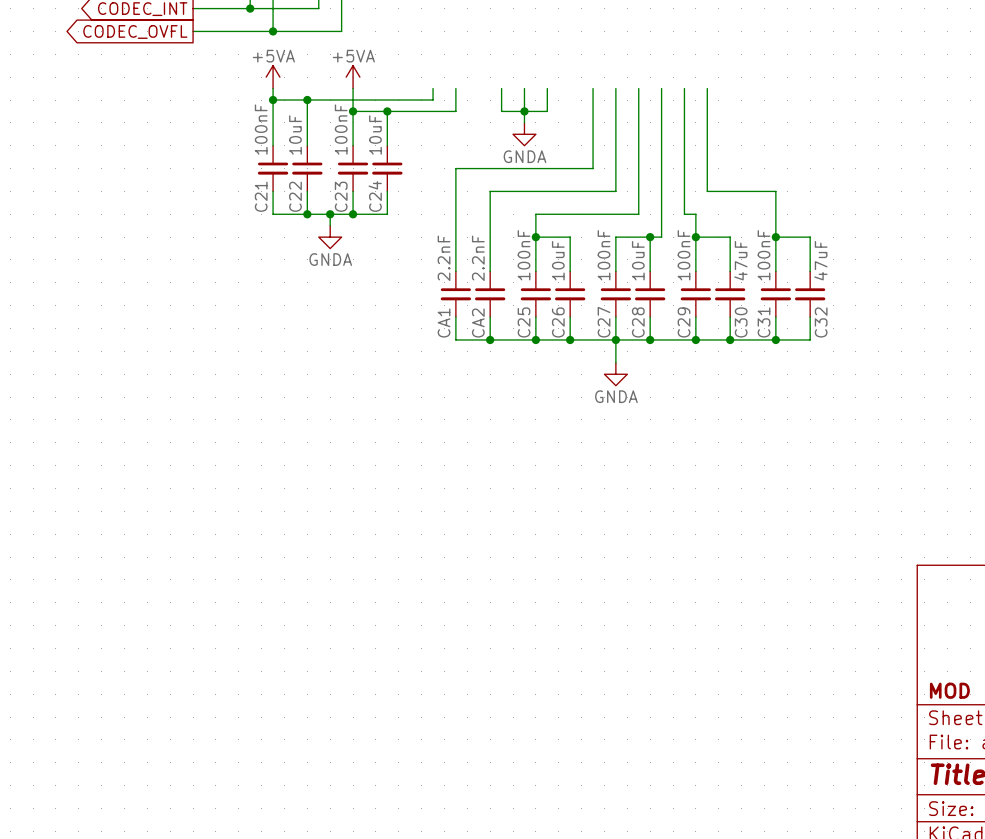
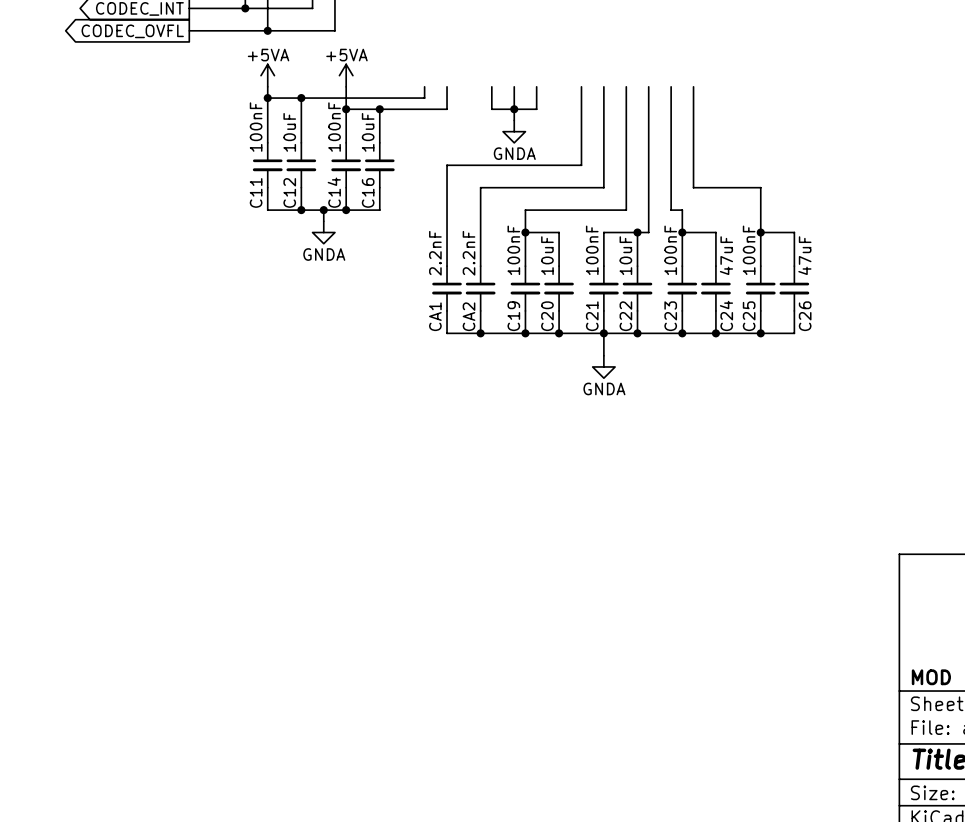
C21 name: C21 (261, 196) -> C11 (256, 192)
C22 name: C22 (295, 196) -> C12 (289, 192)
C23 name: C23 (341, 196) -> C14 (334, 192)
C24 name: C24 (375, 196) -> C16 (368, 192)
C25 name: C25 (524, 322) -> C19 (513, 316)
C26 name: C26 (558, 322) -> C20 (547, 316)
C27 name: C27 (604, 322) -> C21 (592, 316)
C28 name: C28 (638, 322) -> C22 (625, 316)
C29 name: C29 (684, 322) -> C23 (670, 316)
C30 name: C30 (741, 322) -> C24 (726, 315)
C31 name: C31 (764, 322) -> C25 (749, 316)
C32 name: C32 (821, 322) -> C26 (805, 316)

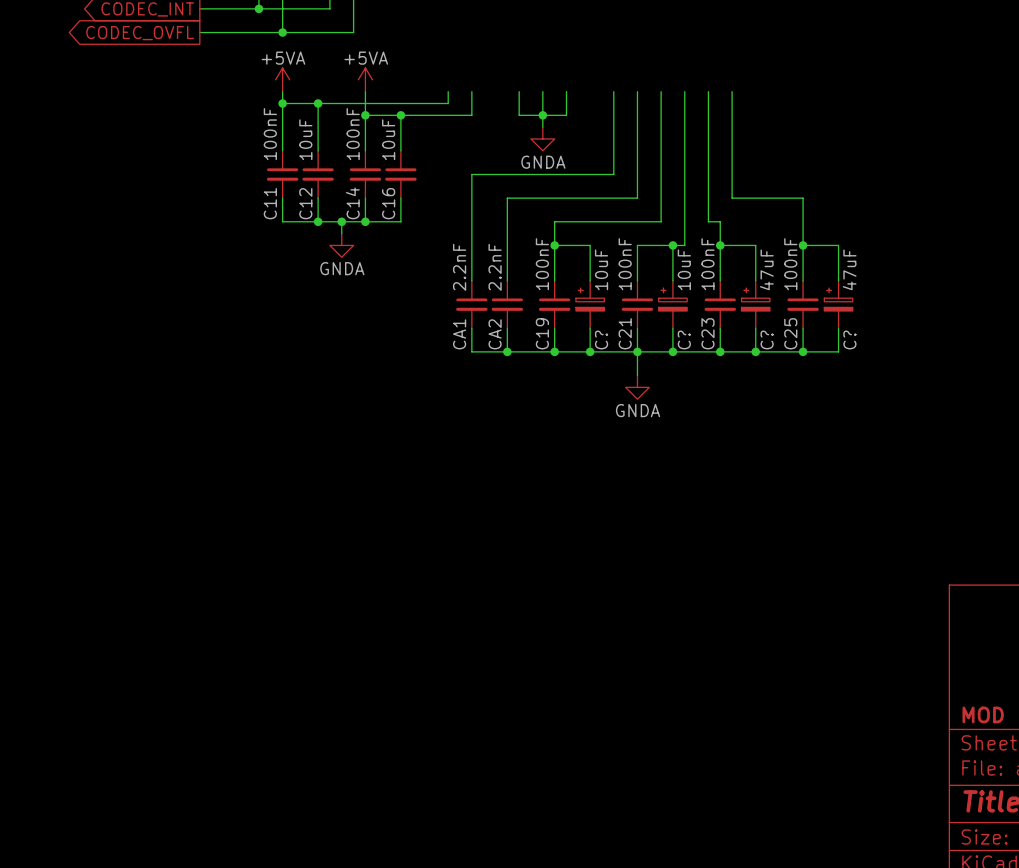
C20: 10uF (559, 288) -> none
C?: none -> 10uF (590, 304)
C22: 10uF (637, 288) -> none
C?: none -> 10uF (672, 304)
C24: 47uF (715, 288) -> none
C?: none -> 47uF (755, 304)
C26: 47uF (794, 288) -> none
C?: none -> 47uF (838, 304)

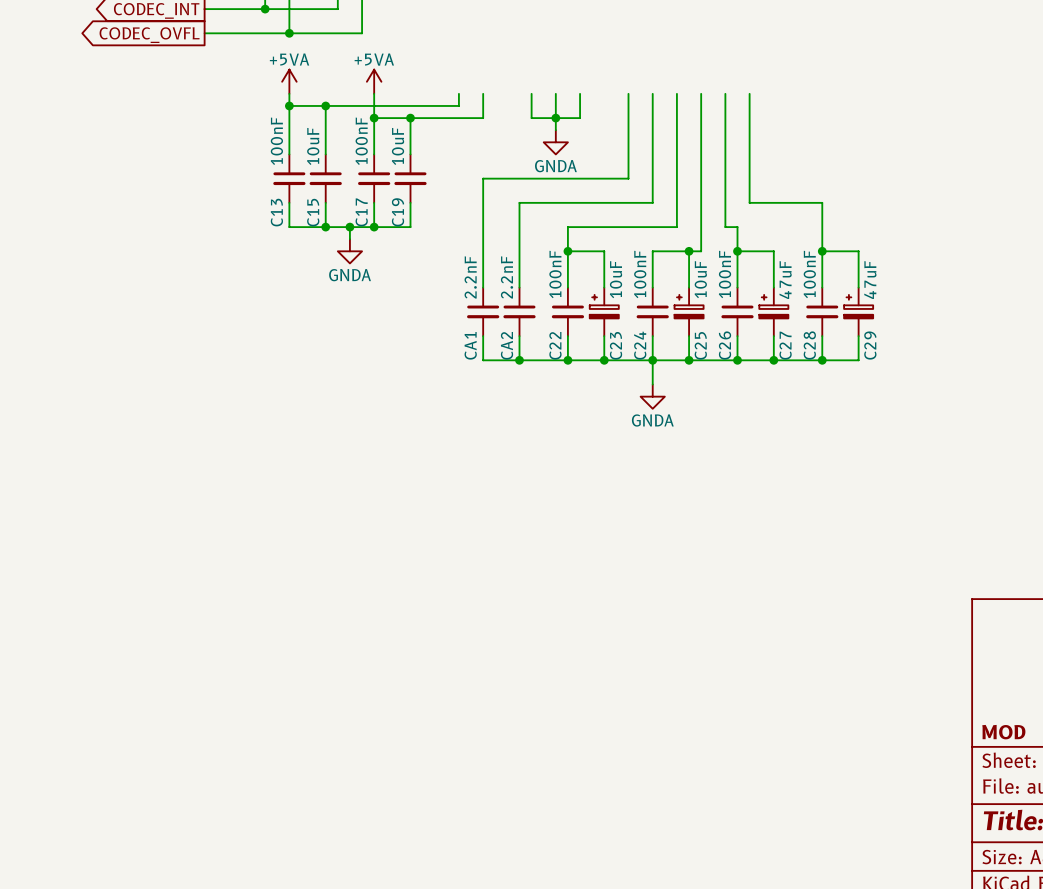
C11 name: C11 (270, 203) -> C13 (276, 212)
C12 name: C12 (305, 203) -> C15 (313, 212)
C14 name: C14 (352, 203) -> C17 (361, 212)
C16 name: C16 (388, 203) -> C19 (398, 212)
C19 name: C19 (542, 333) -> C22 (555, 345)
C21 name: C21 (625, 333) -> C24 (640, 345)
C23 name: C23 (707, 333) -> C26 (725, 345)
C25 name: C25 (790, 333) -> C28 (809, 345)
C? name: C? (601, 339) -> C23 (616, 345)
C? name: C? (684, 339) -> C25 (700, 345)
C? name: C? (767, 339) -> C27 (785, 345)
C? name: C? (849, 339) -> C29 (870, 345)

